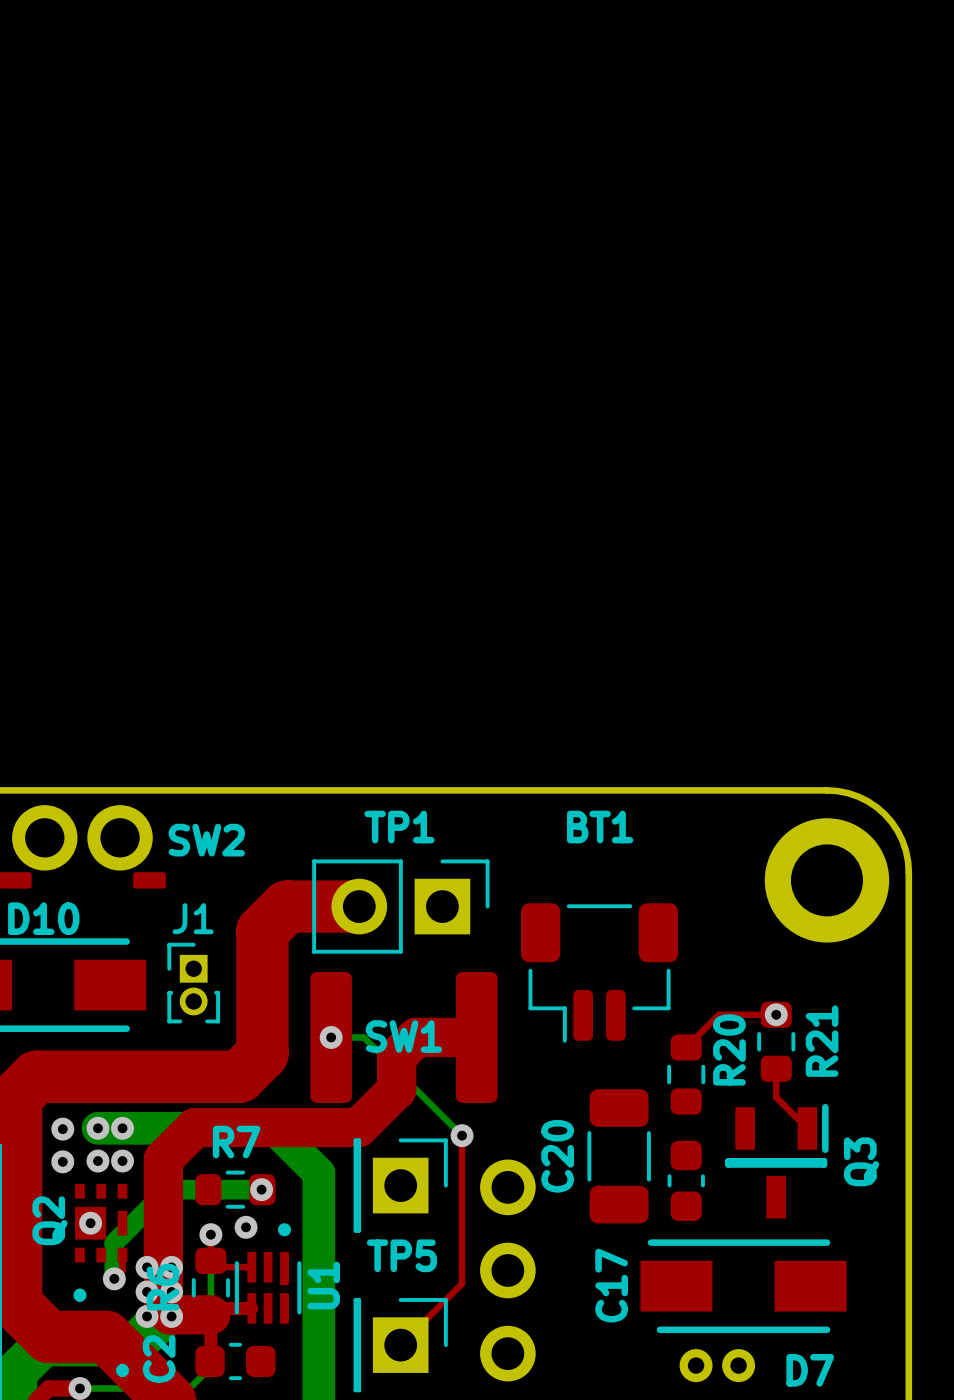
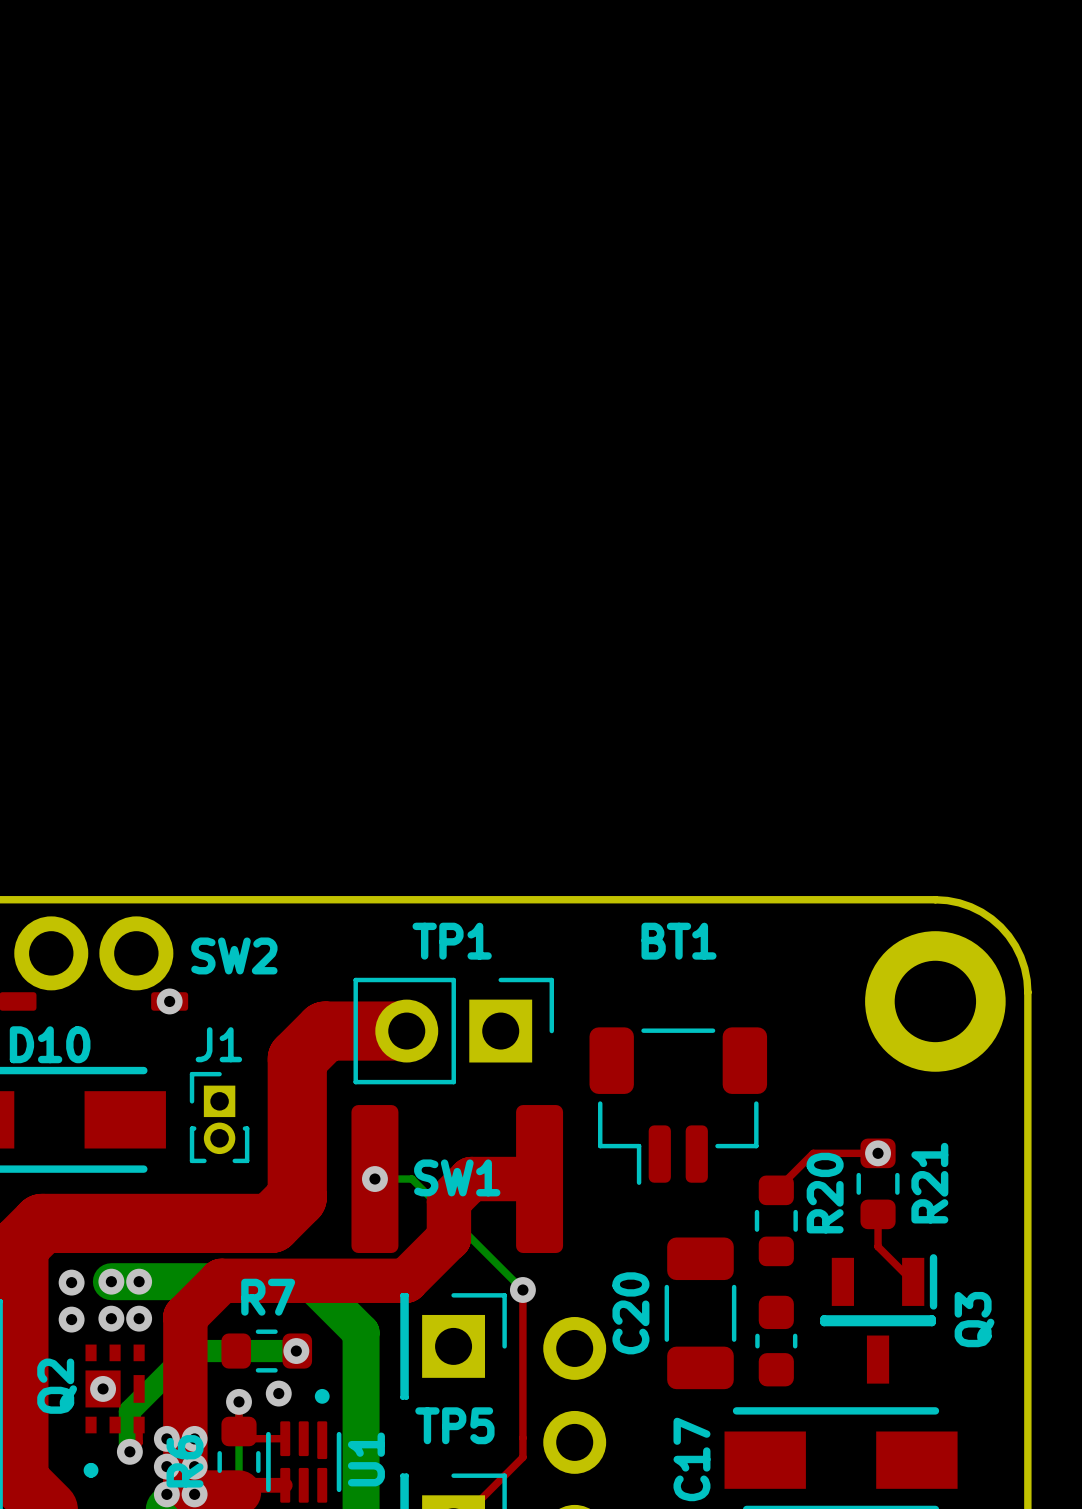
via: none -> (169, 1001)

